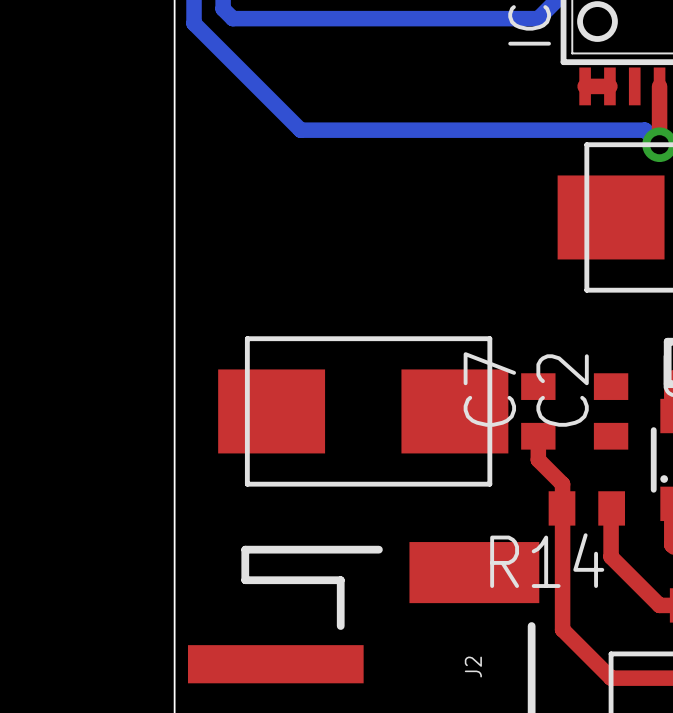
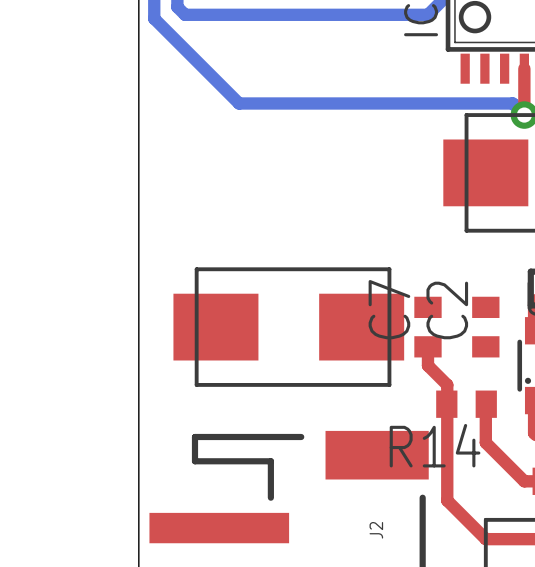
top track: (585, 86) (609, 86) -> none

